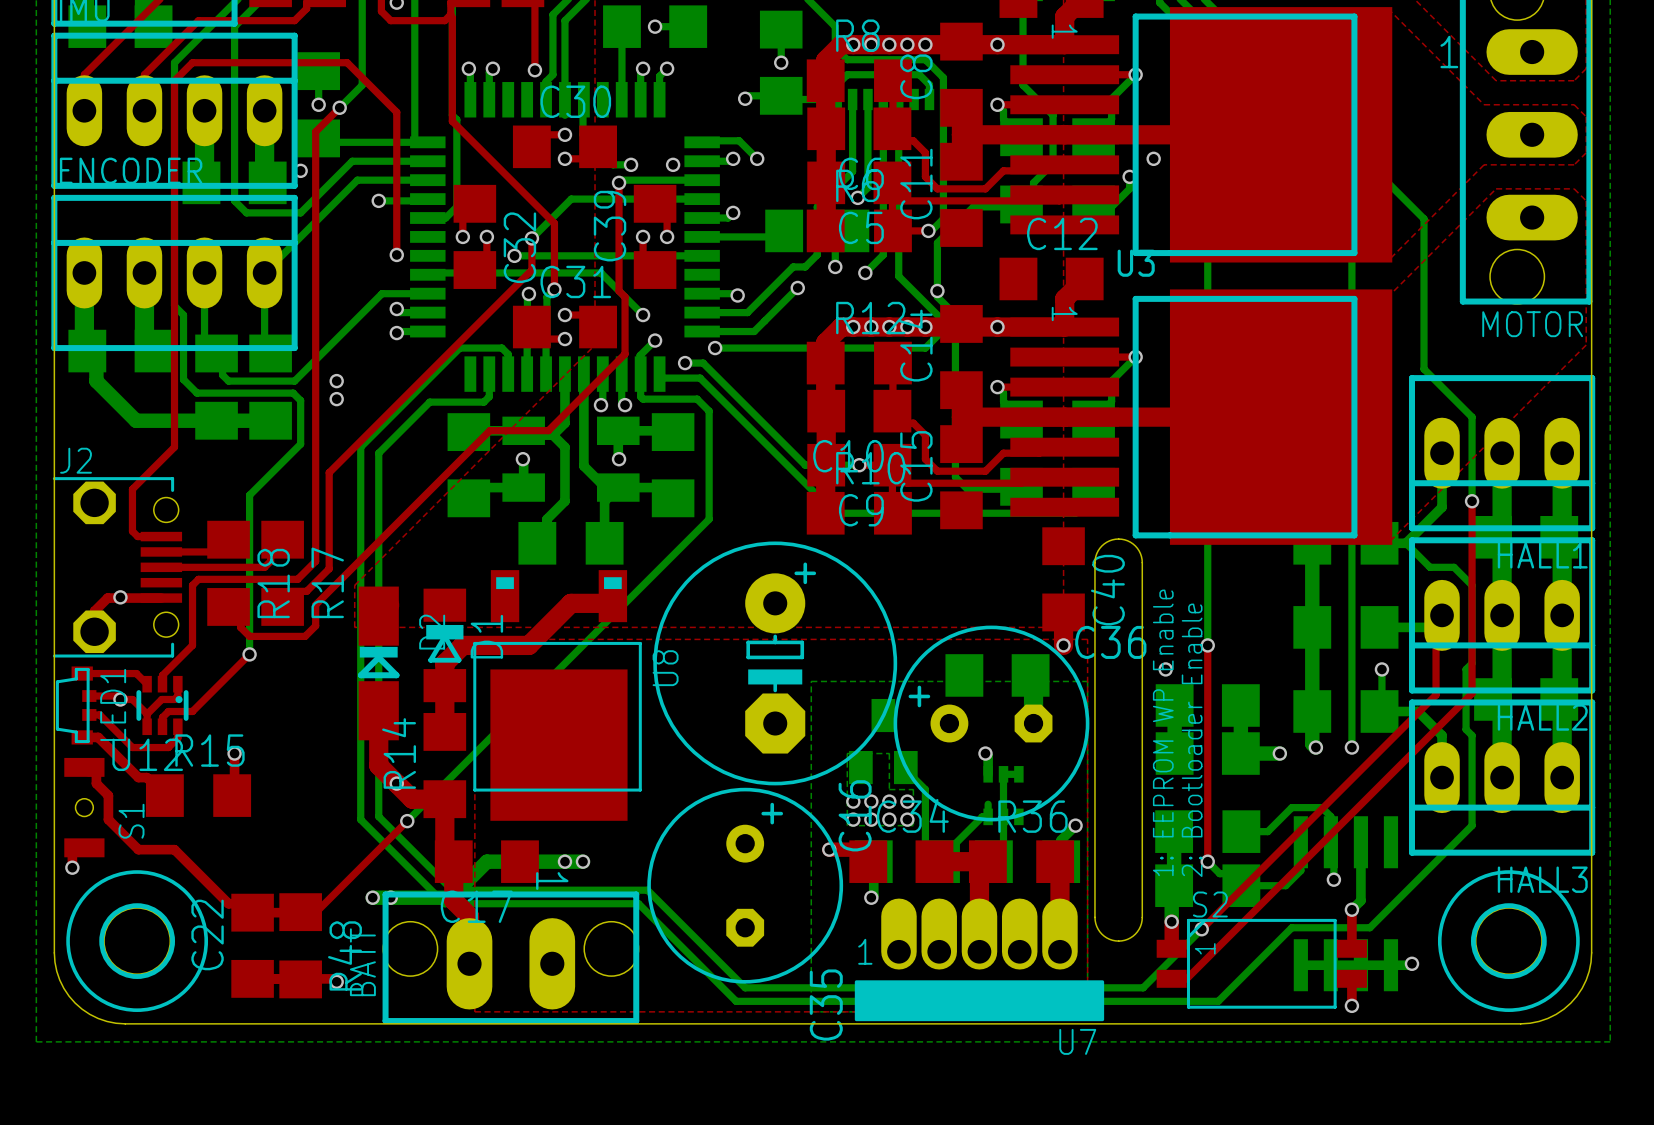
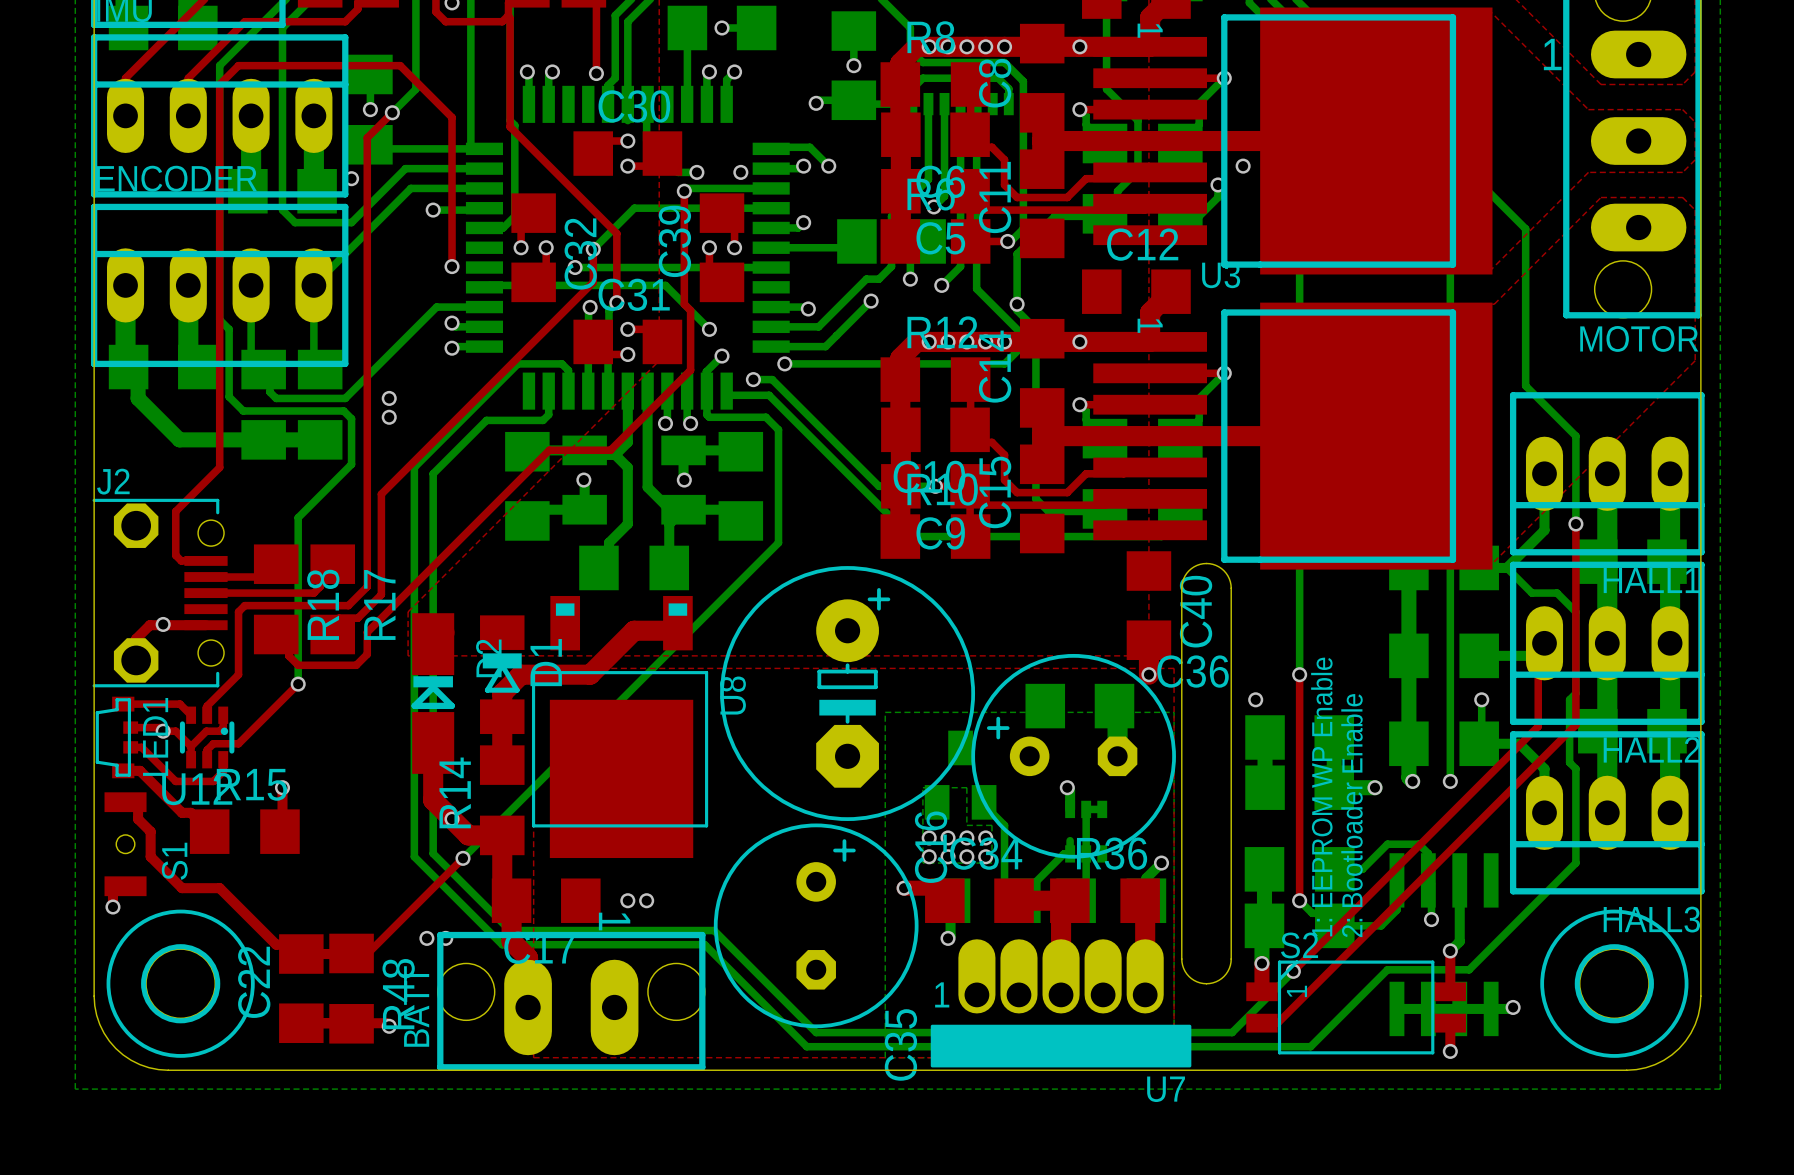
text position: 1: EEPROM WP Enable (1163, 732) -> 1: EEPROM WP Enable (1321, 797)
text position: 2: Bootloader Enable (1192, 740) -> 2: Bootloader Enable (1351, 815)
bottom track: (582, 861) (486, 861) (450, 897) (372, 897) -> none

